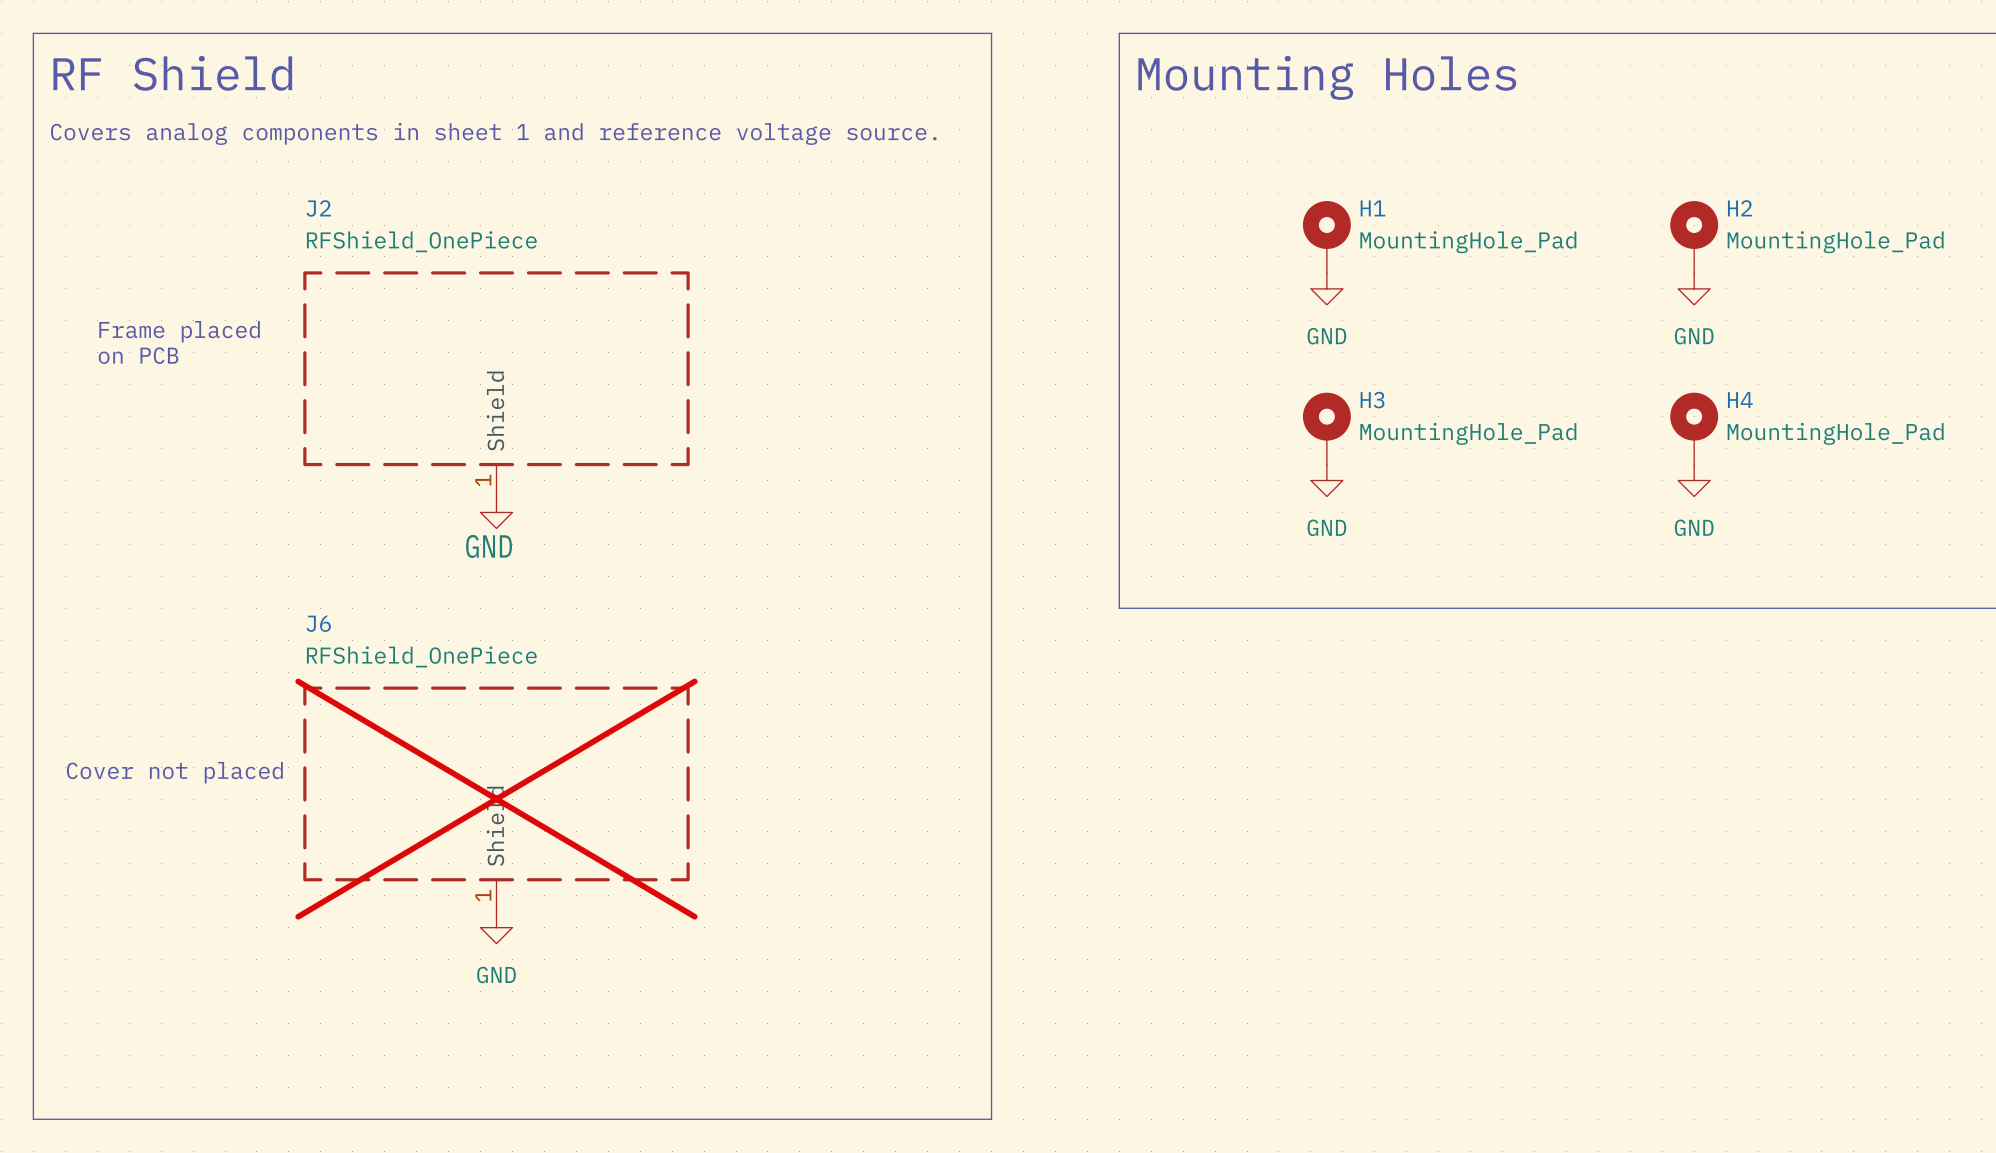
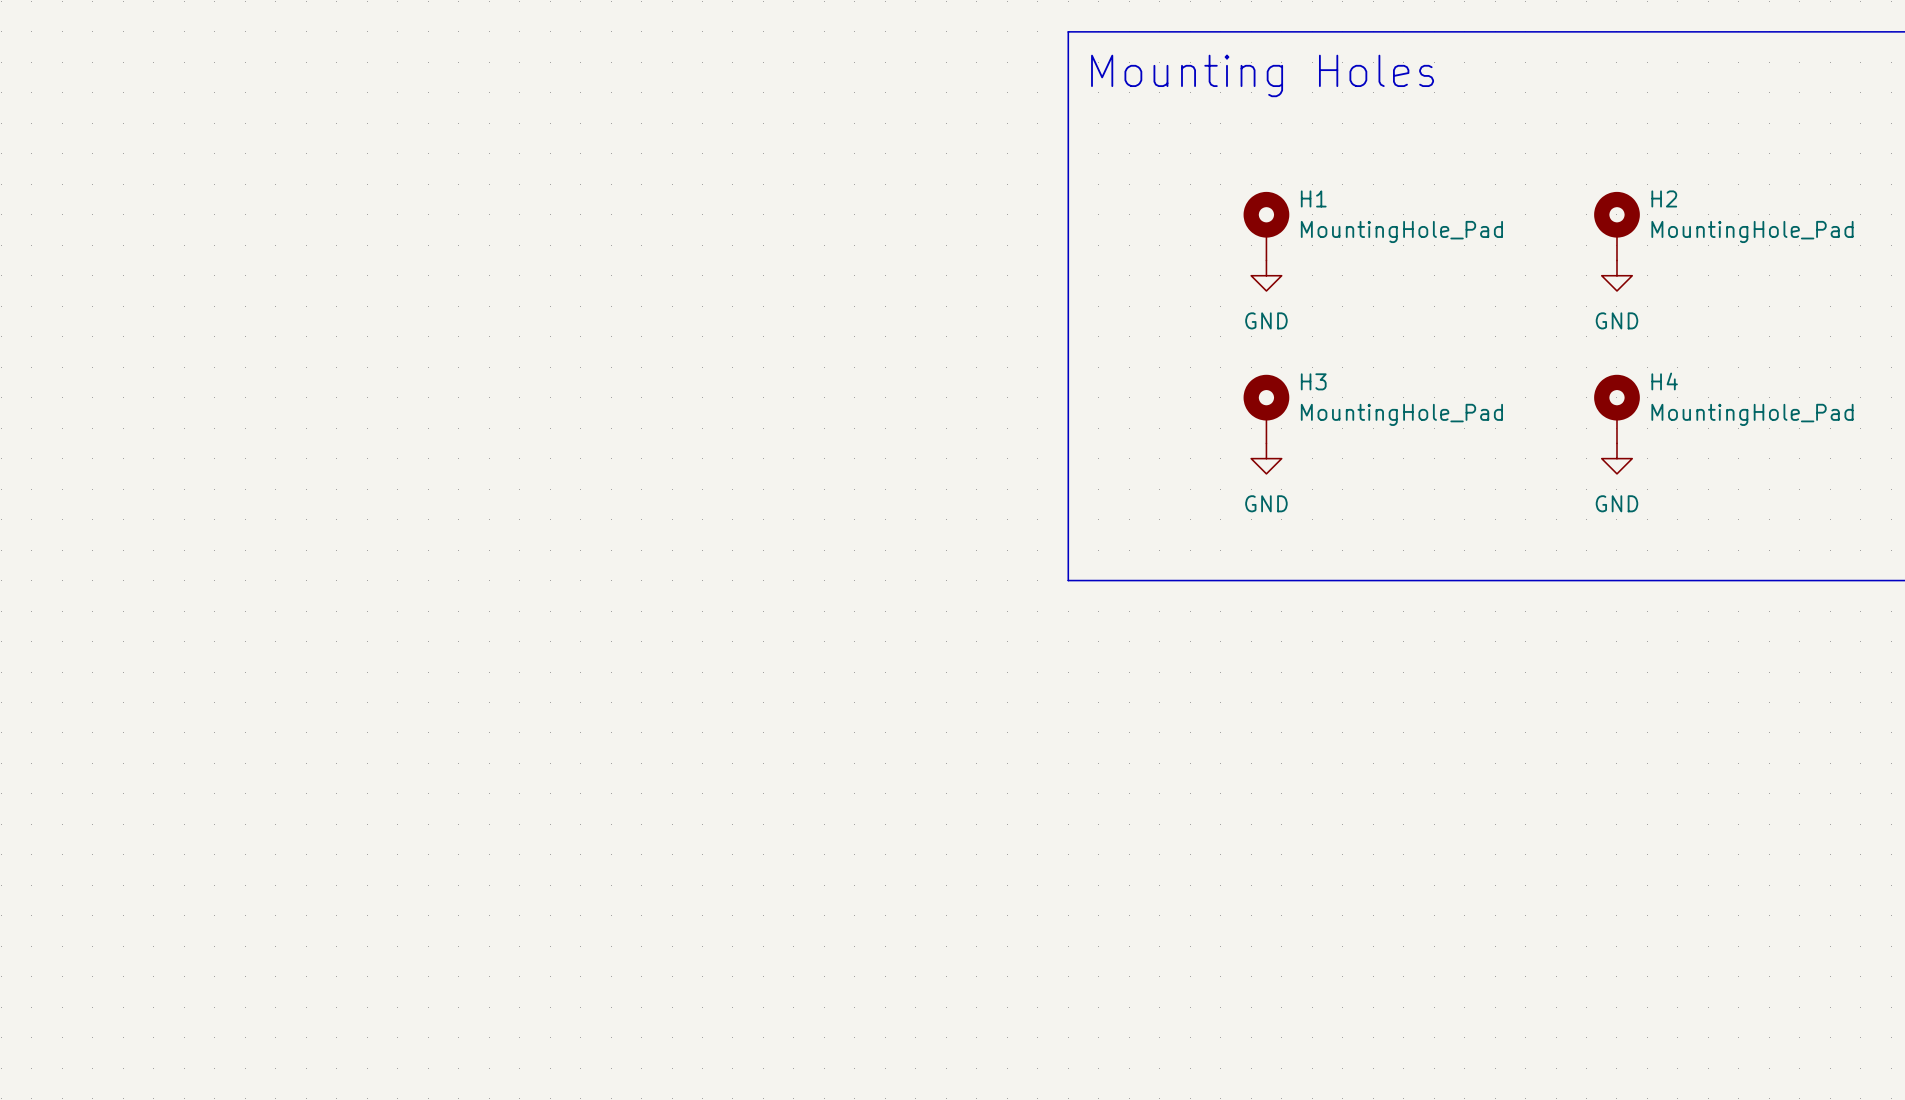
line: (33, 33) (991, 33) (991, 1119) (33, 1119) (33, 33) -> none
text: RF Shield (172, 73) -> none
text: Covers analog components in sheet 1 and reference voltage source. (493, 133) -> none
text: Frame placed (179, 331) -> none
text: on PCB (138, 355) -> none
J2: RFShield_OnePiece (496, 383) -> none
power symbol: GND (496, 512) -> none
text: Cover not placed (174, 772) -> none
J6: RFShield_OnePiece (496, 799) -> none
power symbol: GND (496, 927) -> none

